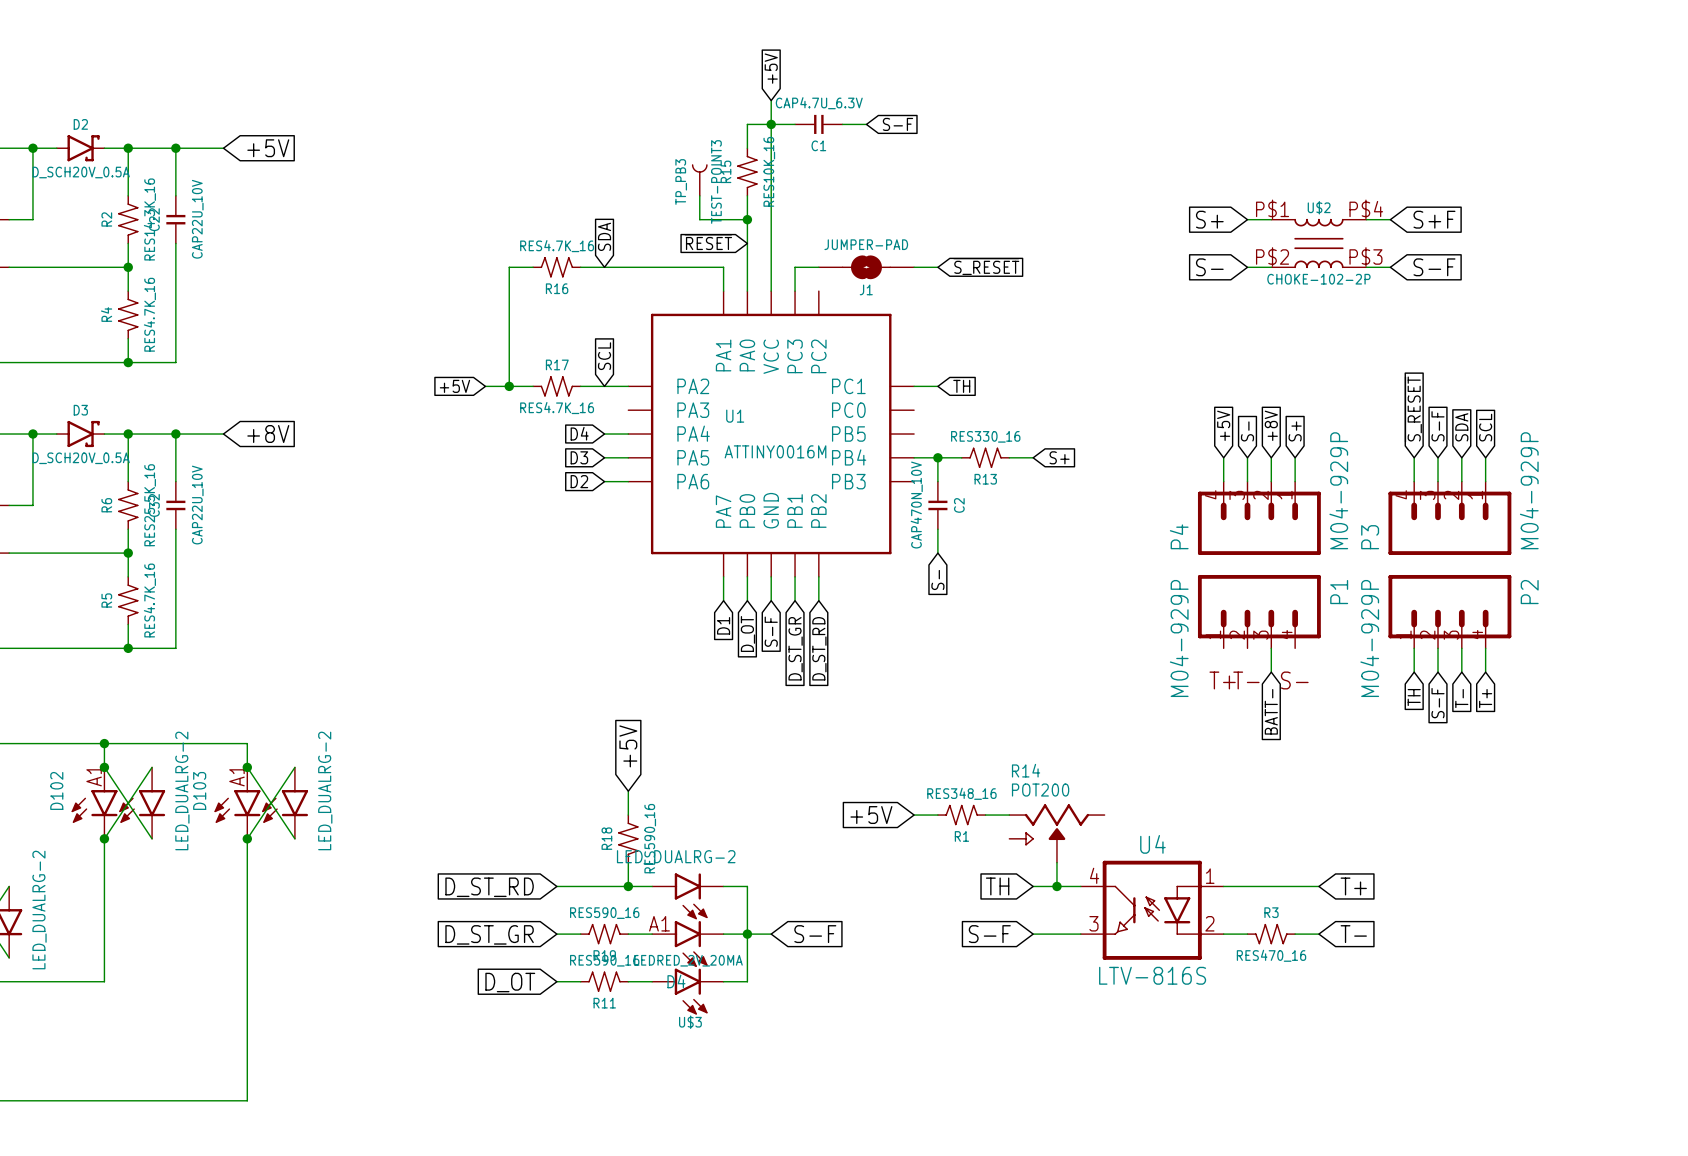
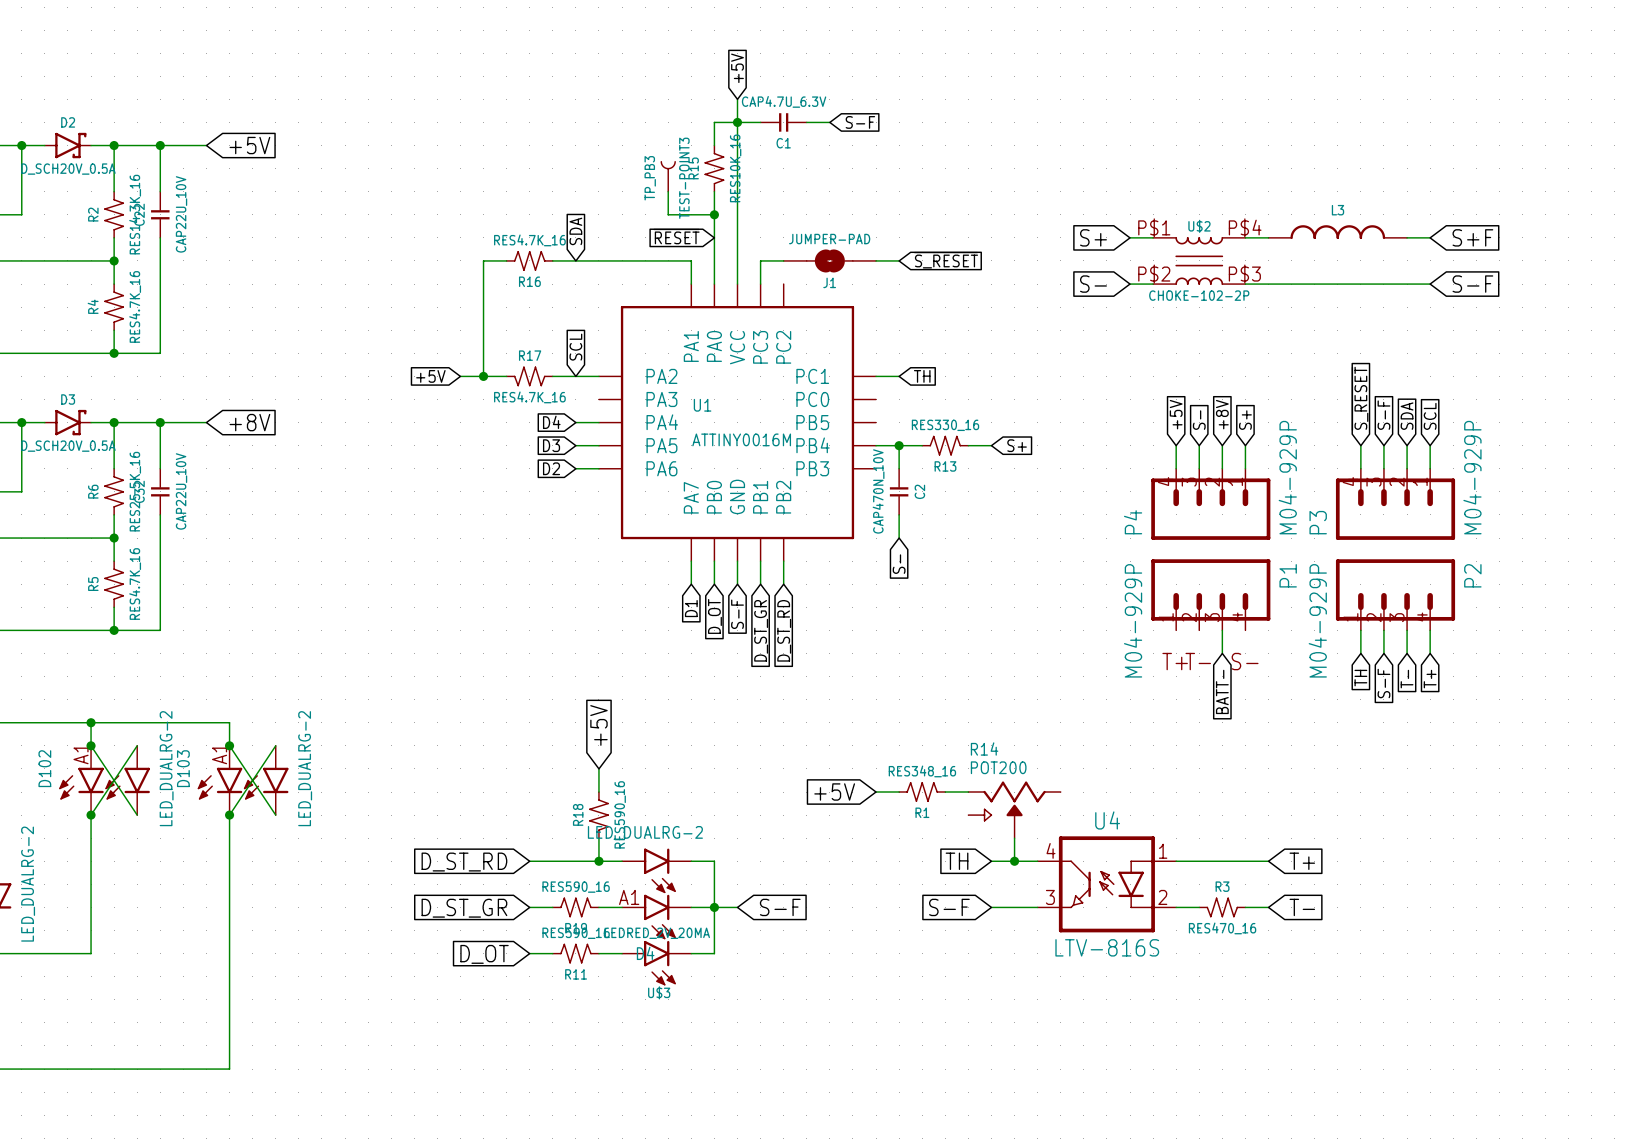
global label position: S+ (1209, 219) -> S+ (1093, 237)
wire: (1247, 219) (1271, 219) -> (1245, 237) (1268, 237)
wire: (1366, 219) (1390, 219) -> (1407, 237) (1430, 237)
global label position: S+F (1434, 219) -> S+F (1472, 237)
L3: none -> (1337, 232)
U$2 position: (1318, 243) -> (1199, 260)
global label position: S- (1209, 267) -> S- (1093, 284)
wire: (1247, 267) (1271, 267) -> (1130, 237) (1153, 237)
wire: (1366, 267) (1390, 267) -> (1130, 284) (1153, 284)
global label position: S-F (1434, 267) -> S-F (1472, 284)
wire: none -> (1245, 284) (1430, 284)

